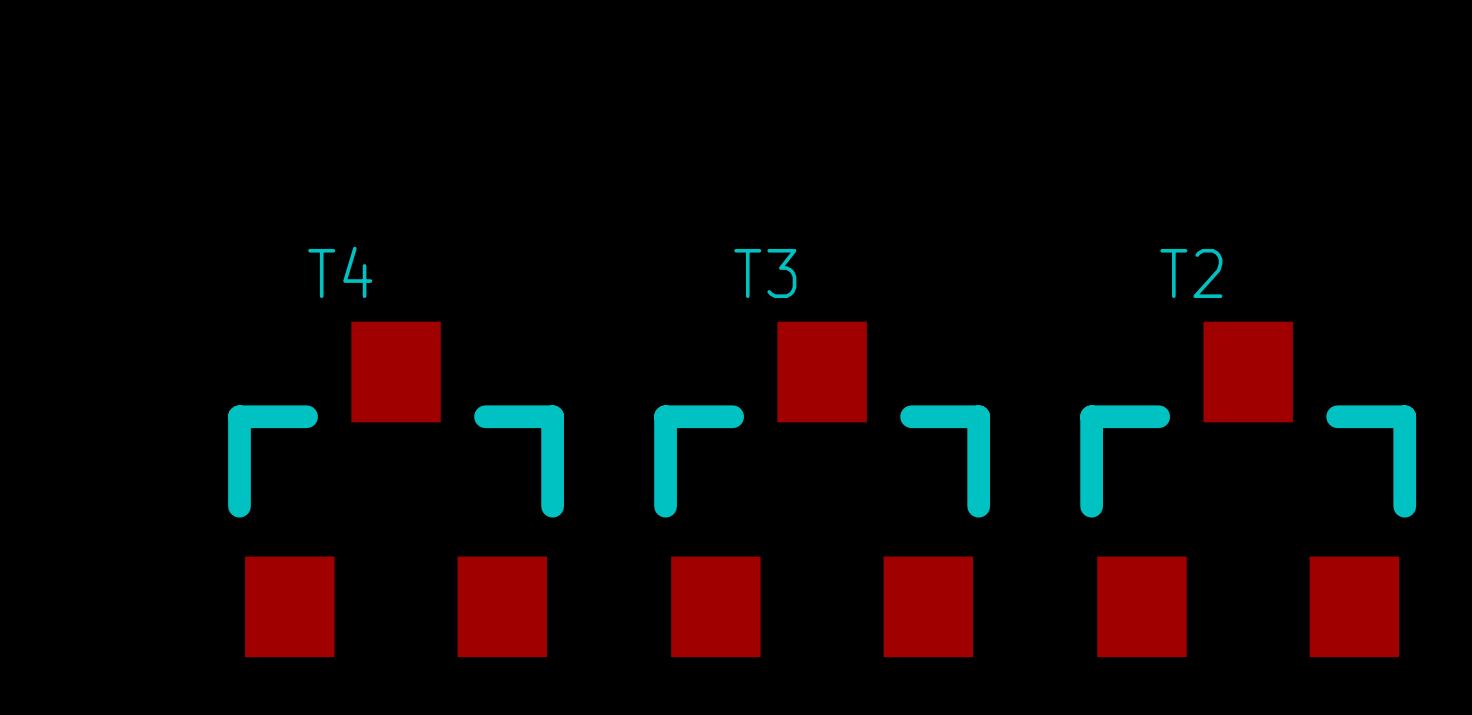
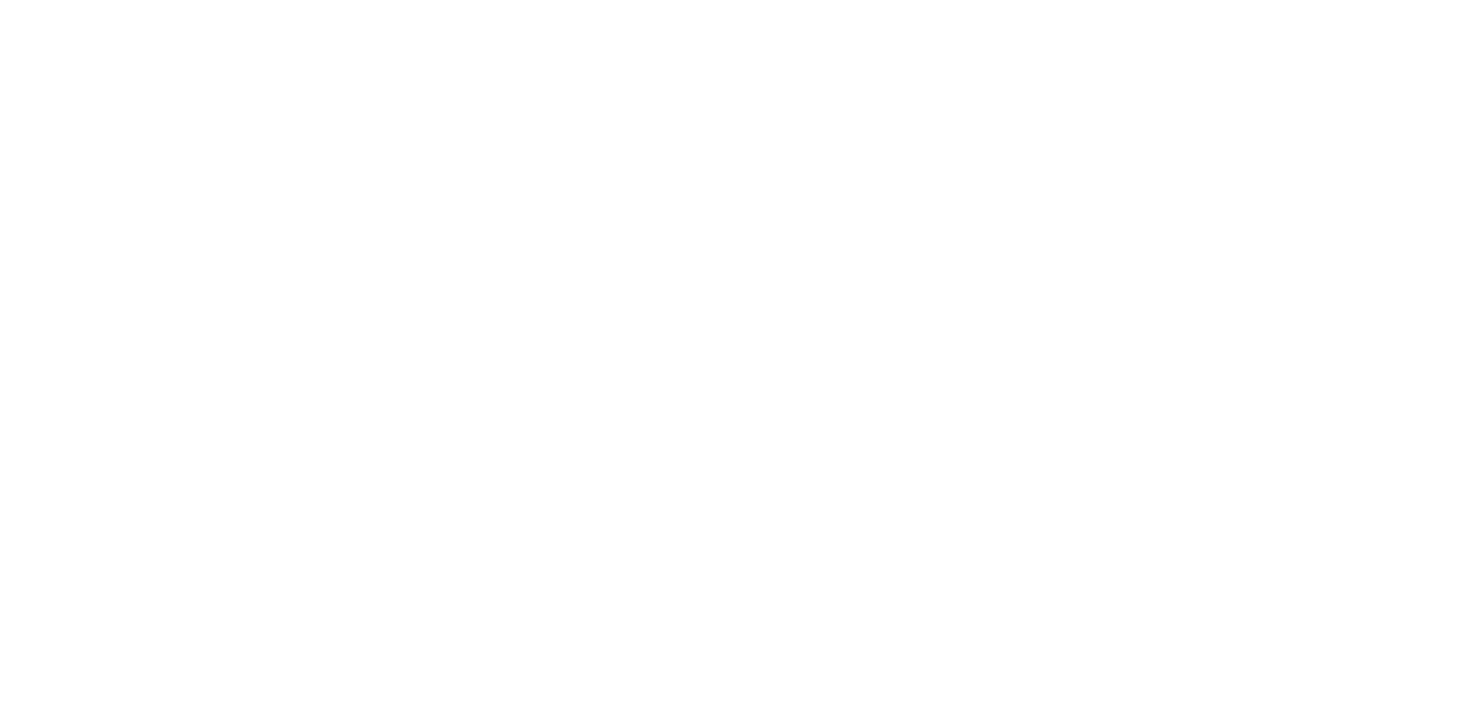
T4: (396, 489) -> none
T3: (822, 489) -> none
T2: (1248, 489) -> none

